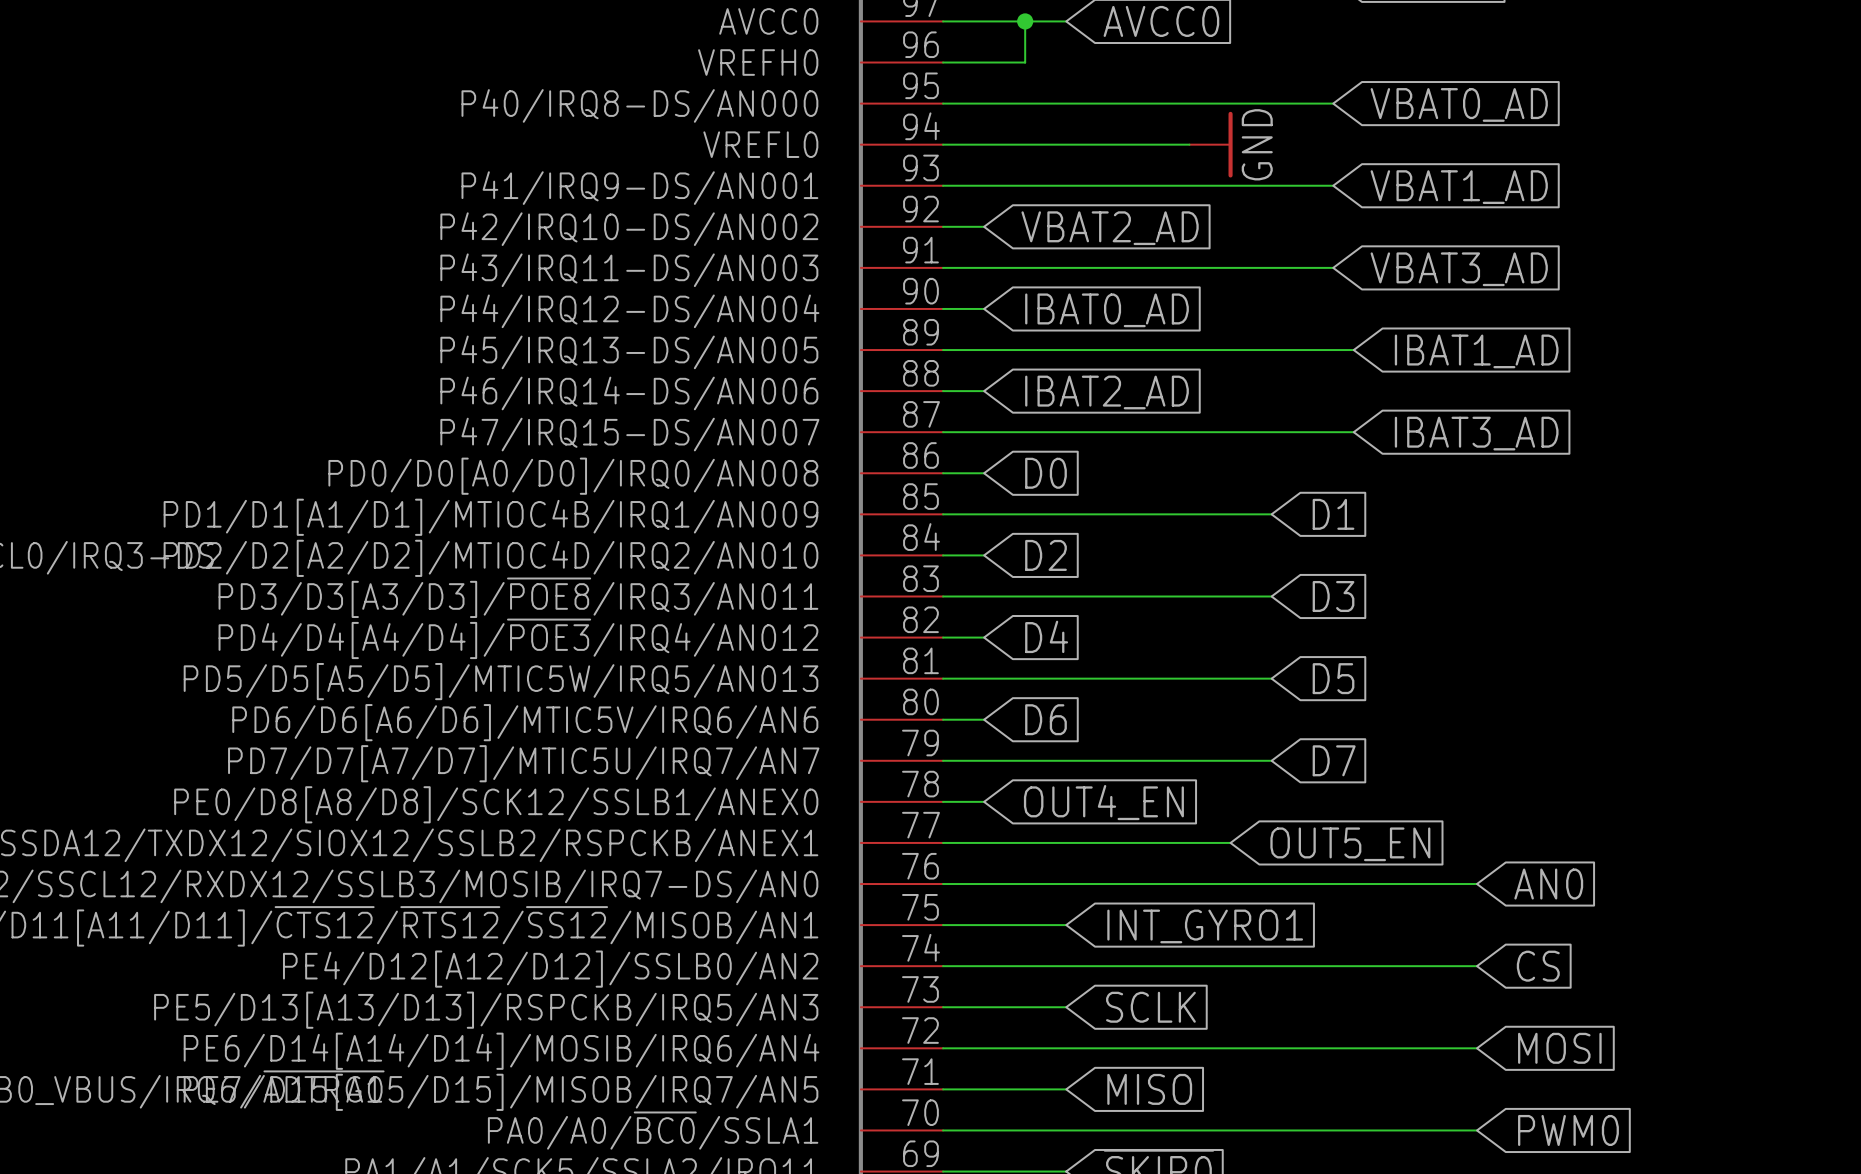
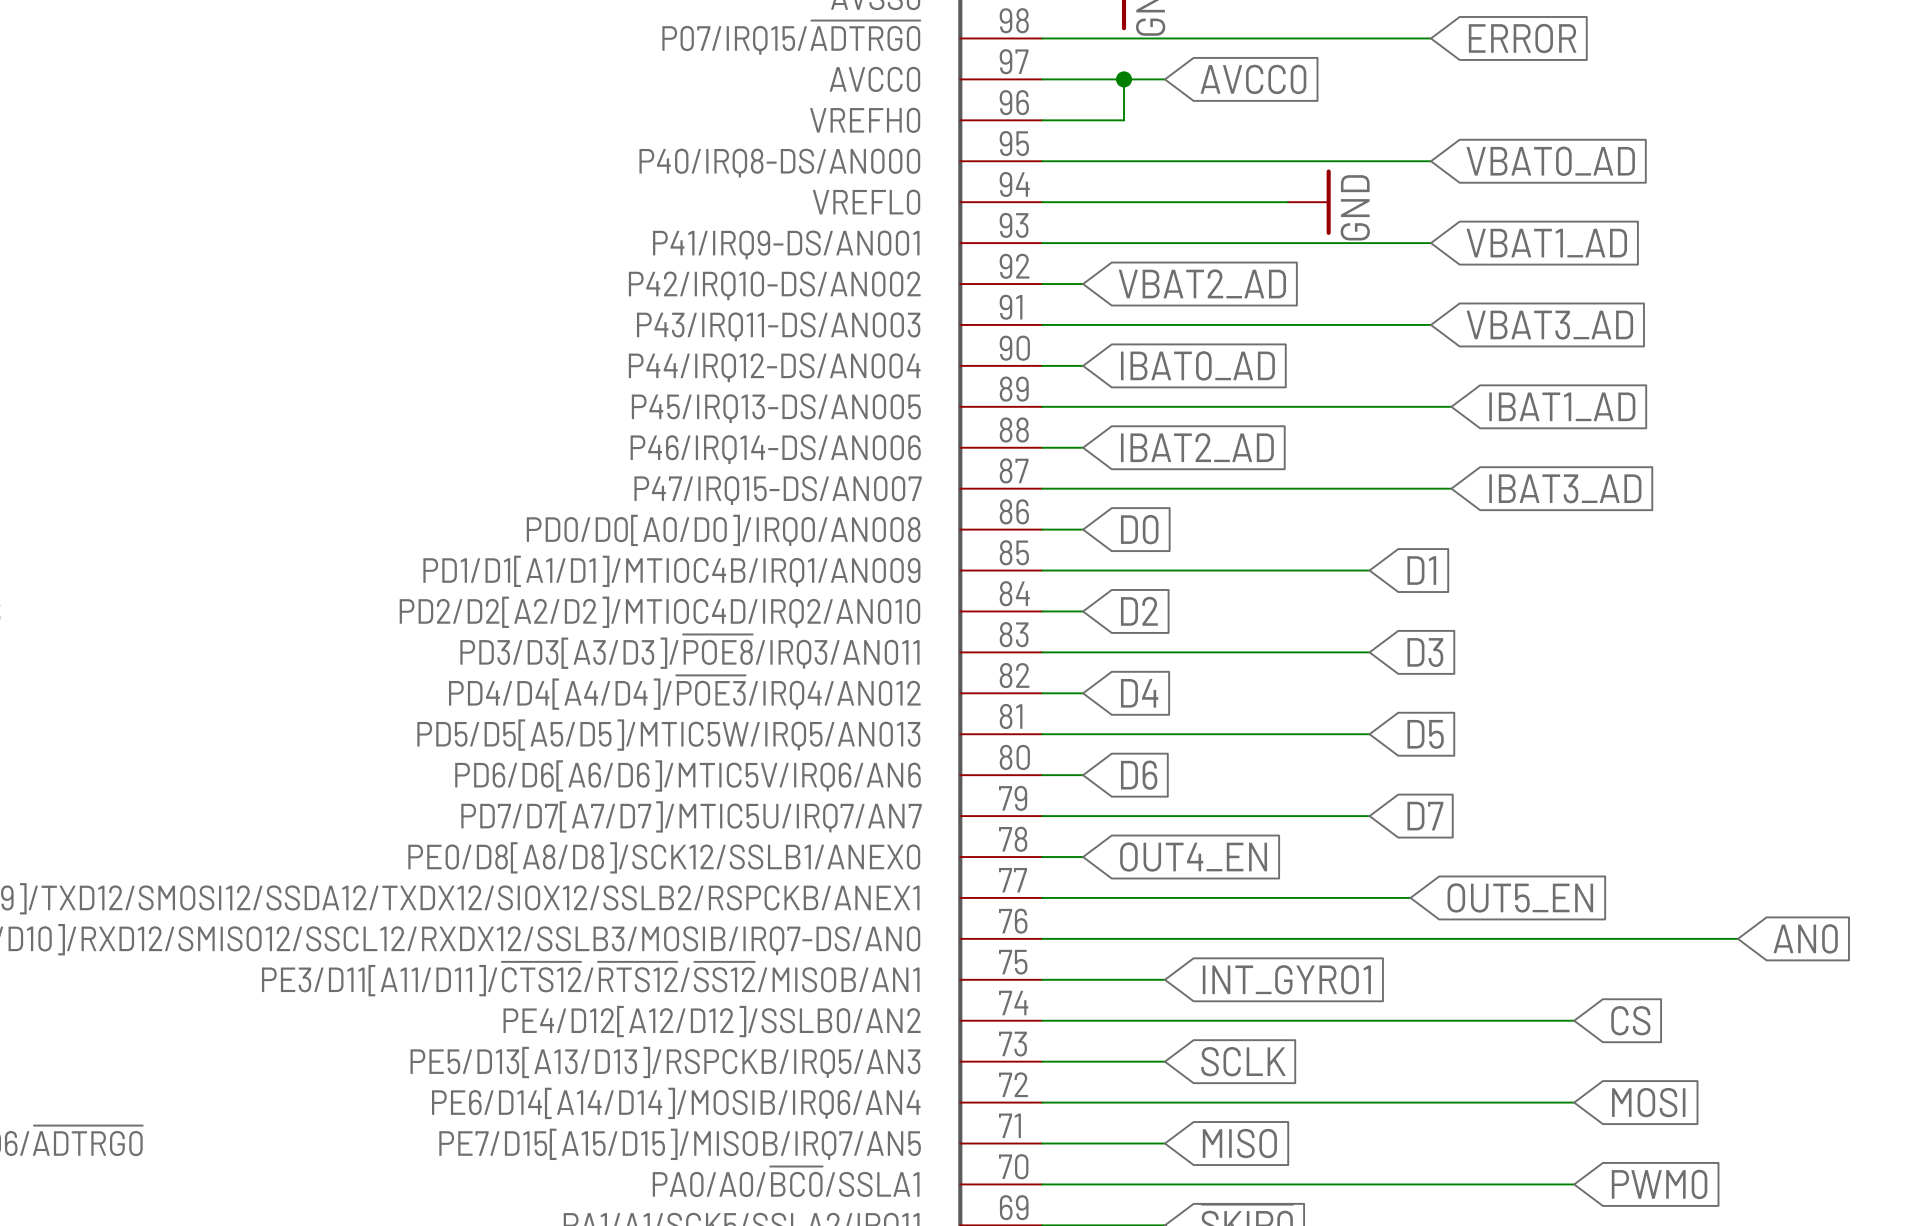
wire: none -> (1328, 897) (1410, 897)
global label position: OUT5_EN (1350, 844) -> OUT5_EN (1520, 897)
wire: none -> (1574, 938) (1737, 938)
global label position: AN0 (1548, 884) -> AN0 (1805, 938)

